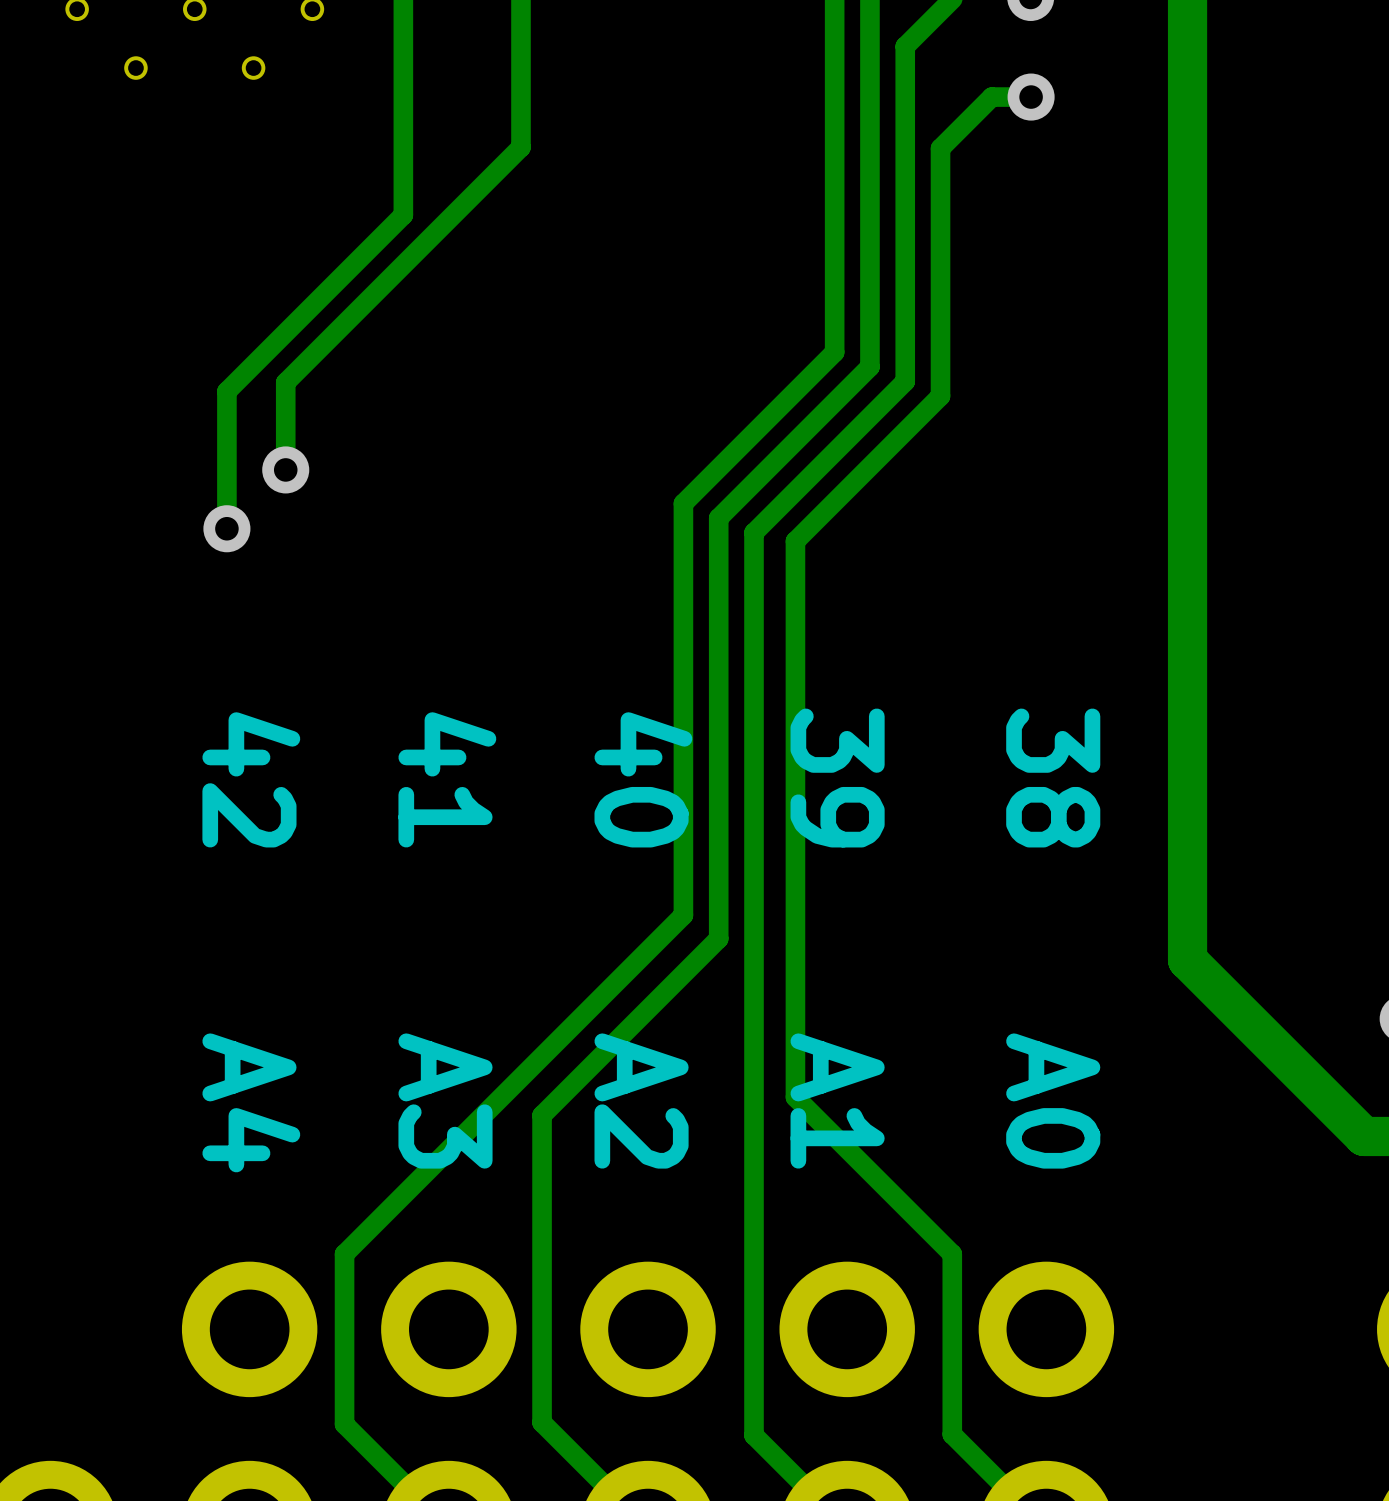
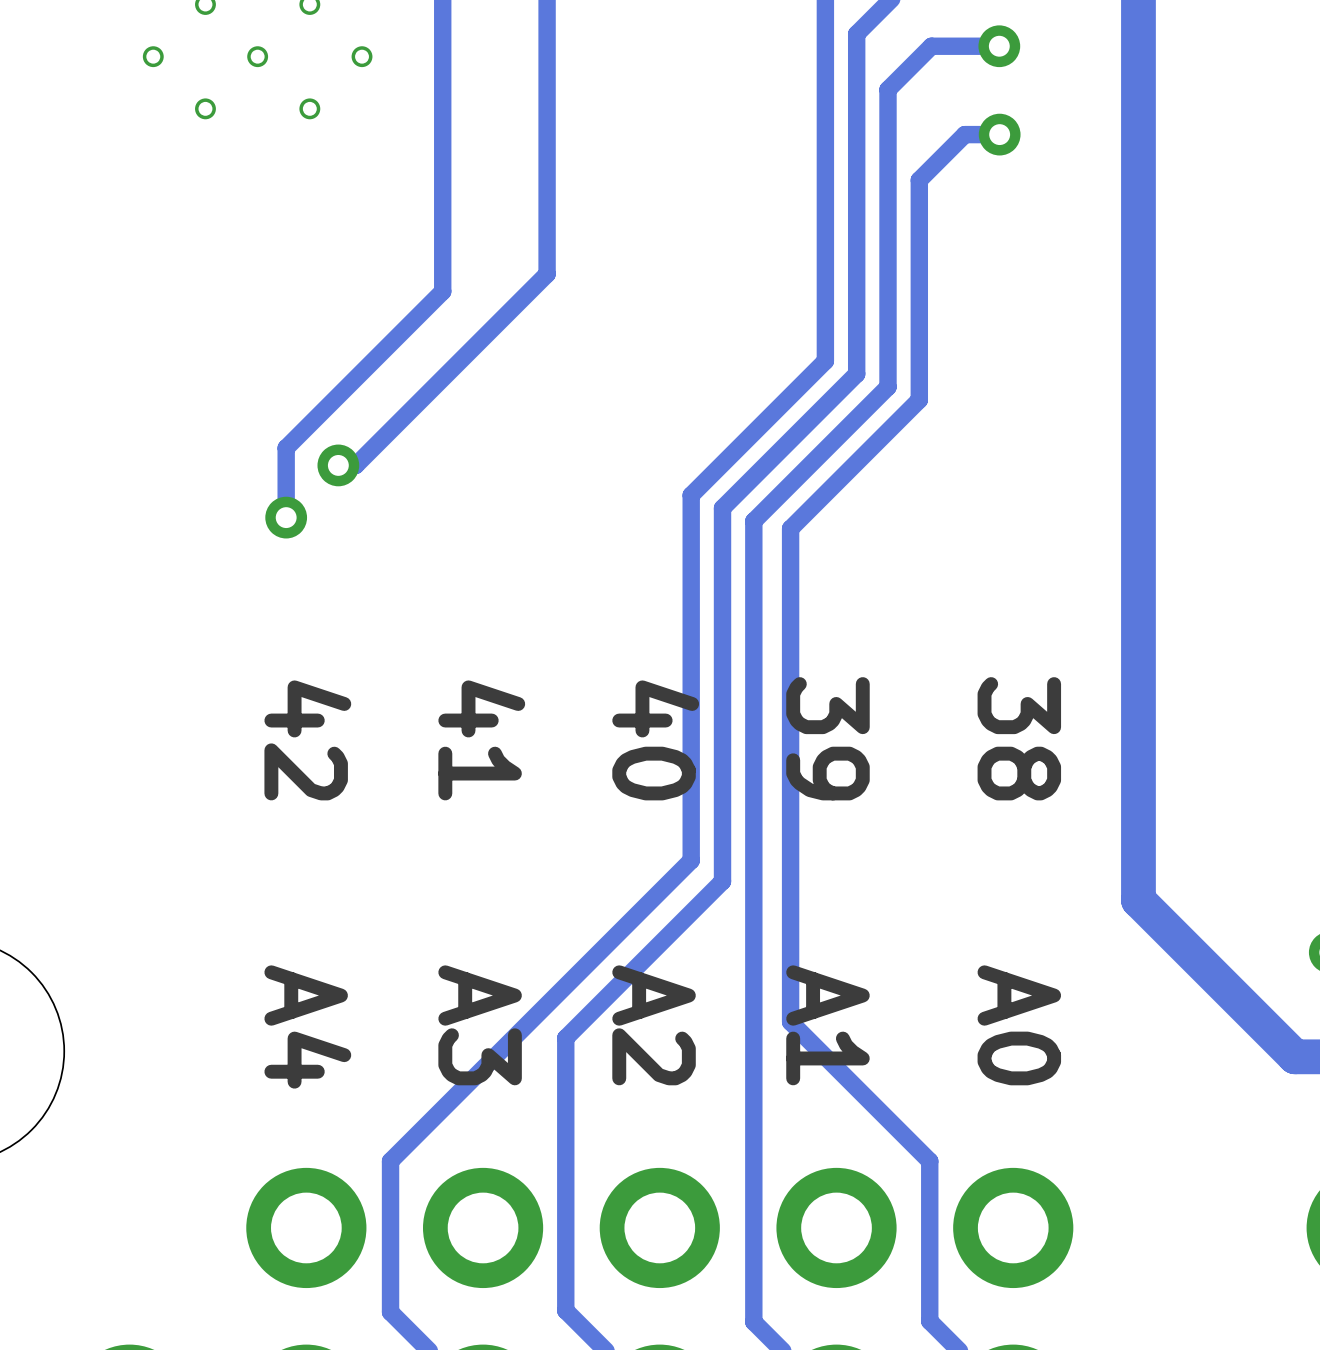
track: (520, 147) (285, 382) (285, 469) -> (547, 179) (547, 274) (355, 465) (338, 465)
track: (403, 215) (226, 391) (226, 450) -> (442, 239) (442, 291) (286, 448)

